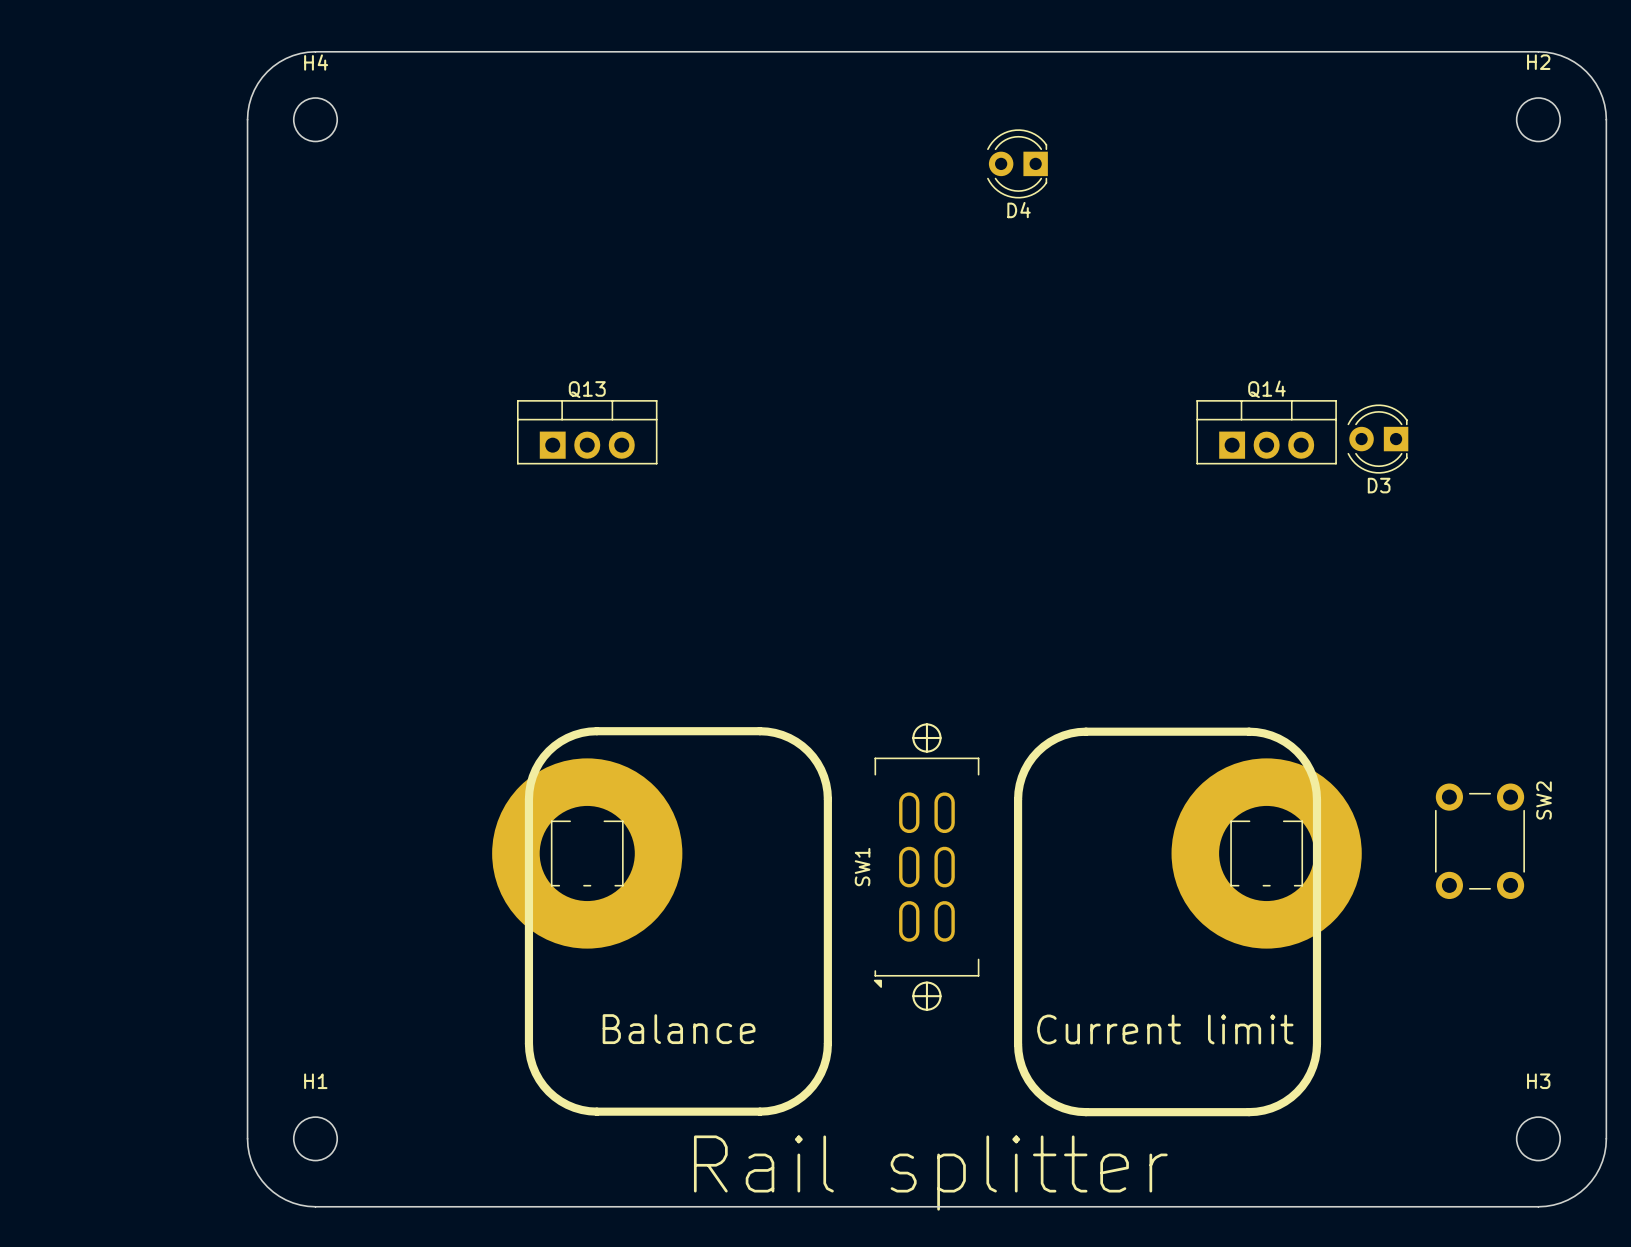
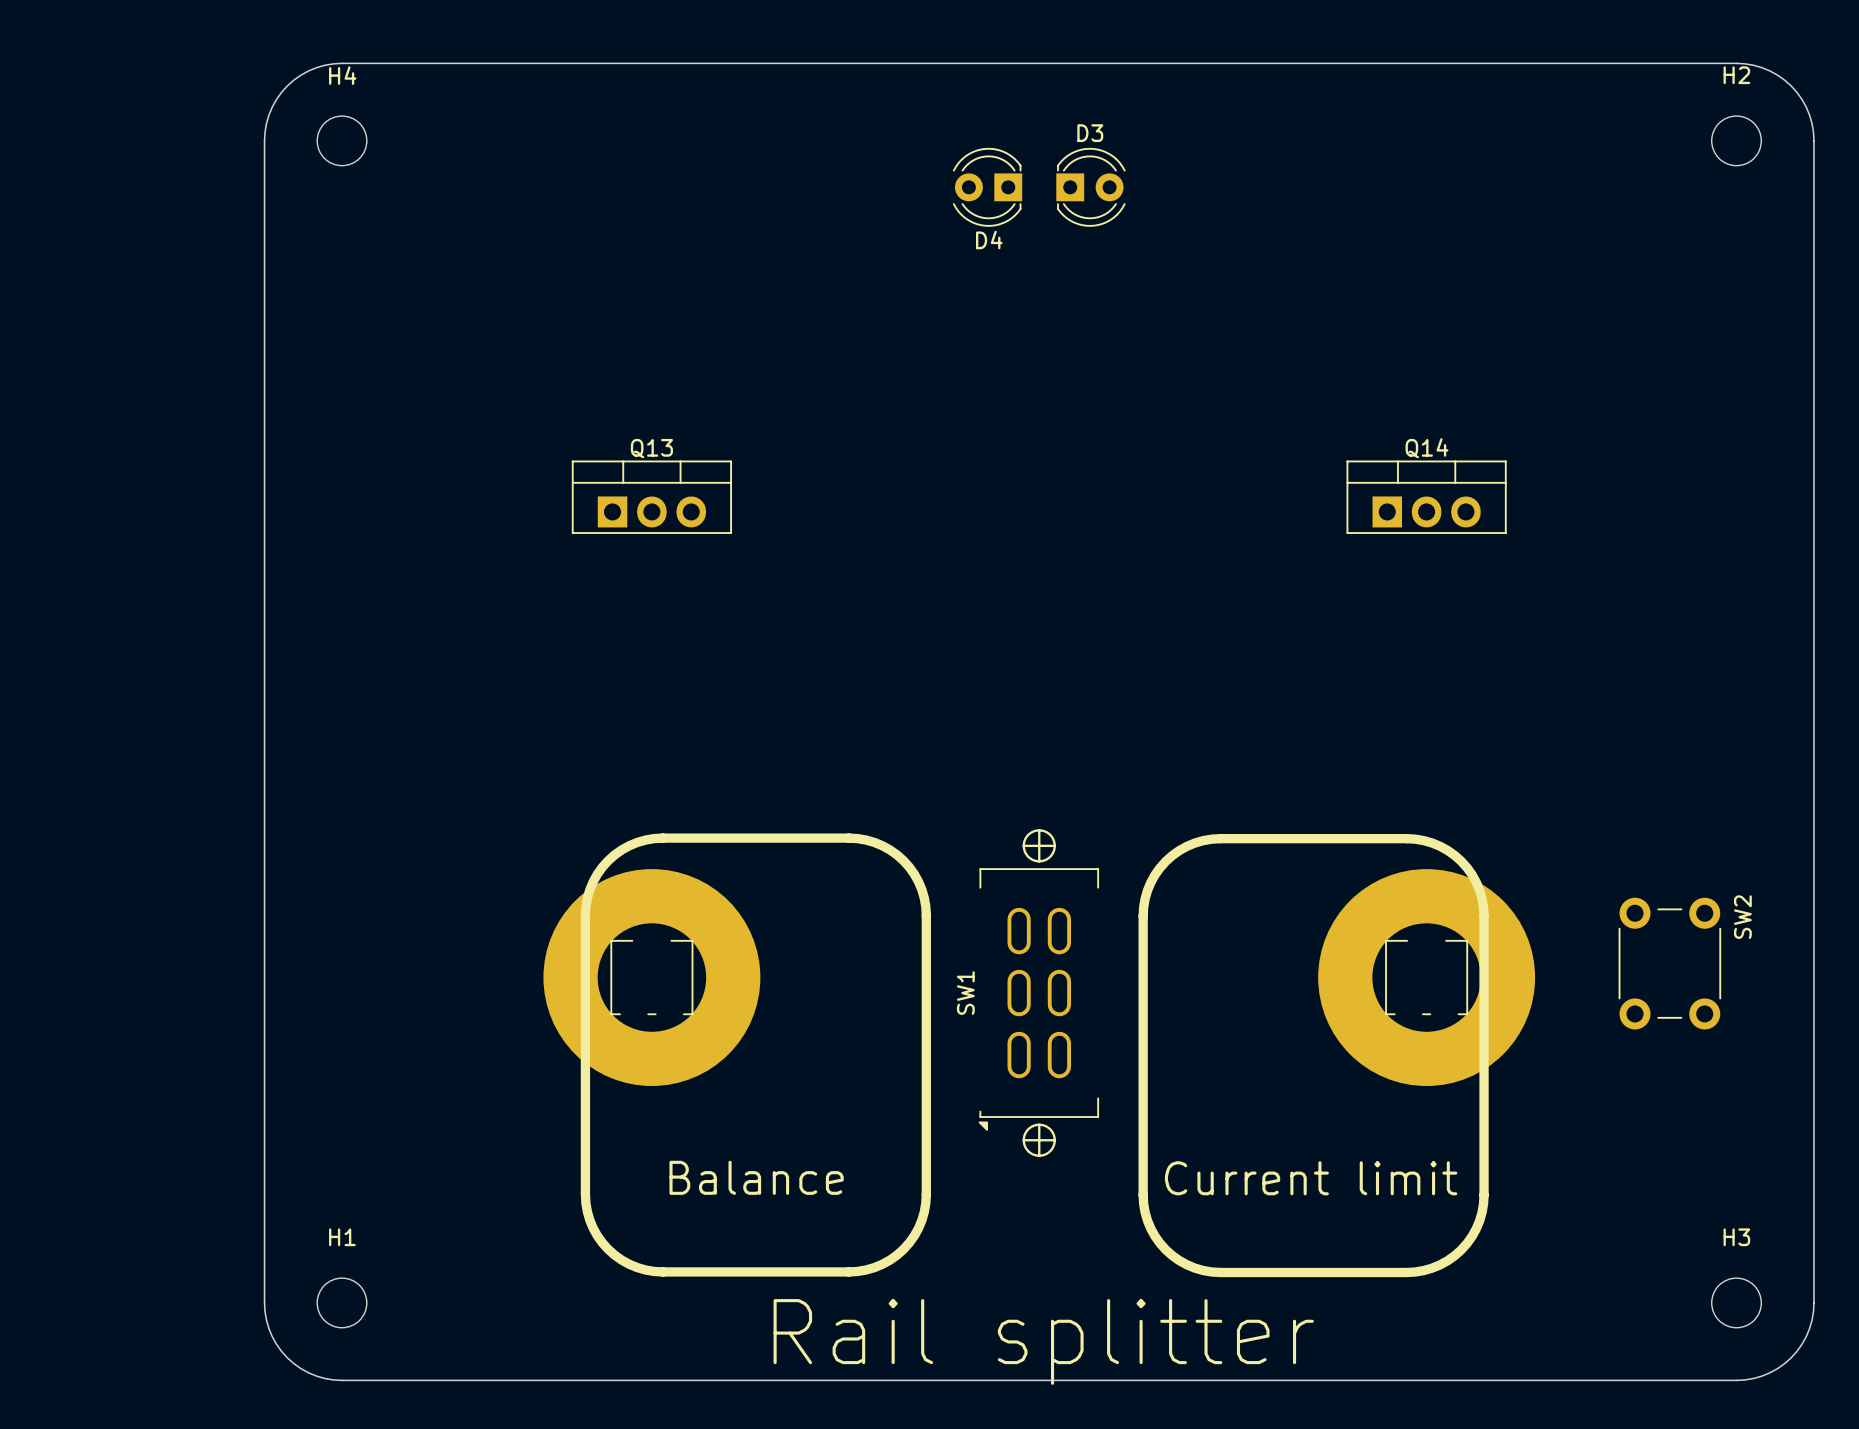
D4 position: (1017, 163) -> (987, 187)
D3 rotation: 0° (1377, 439) -> 180° (1090, 187)
D3 position: (1377, 439) -> (1090, 187)

